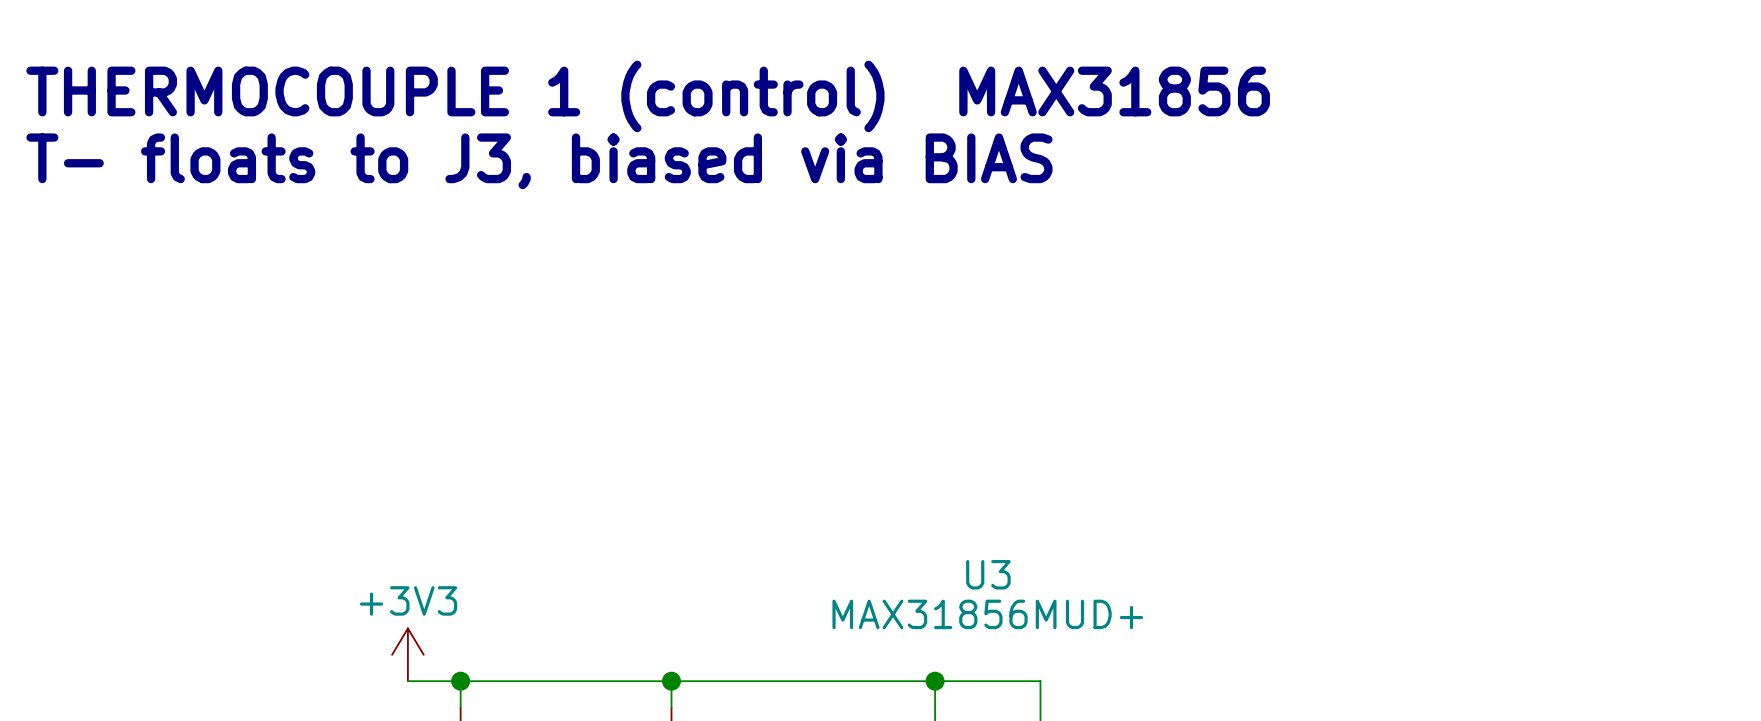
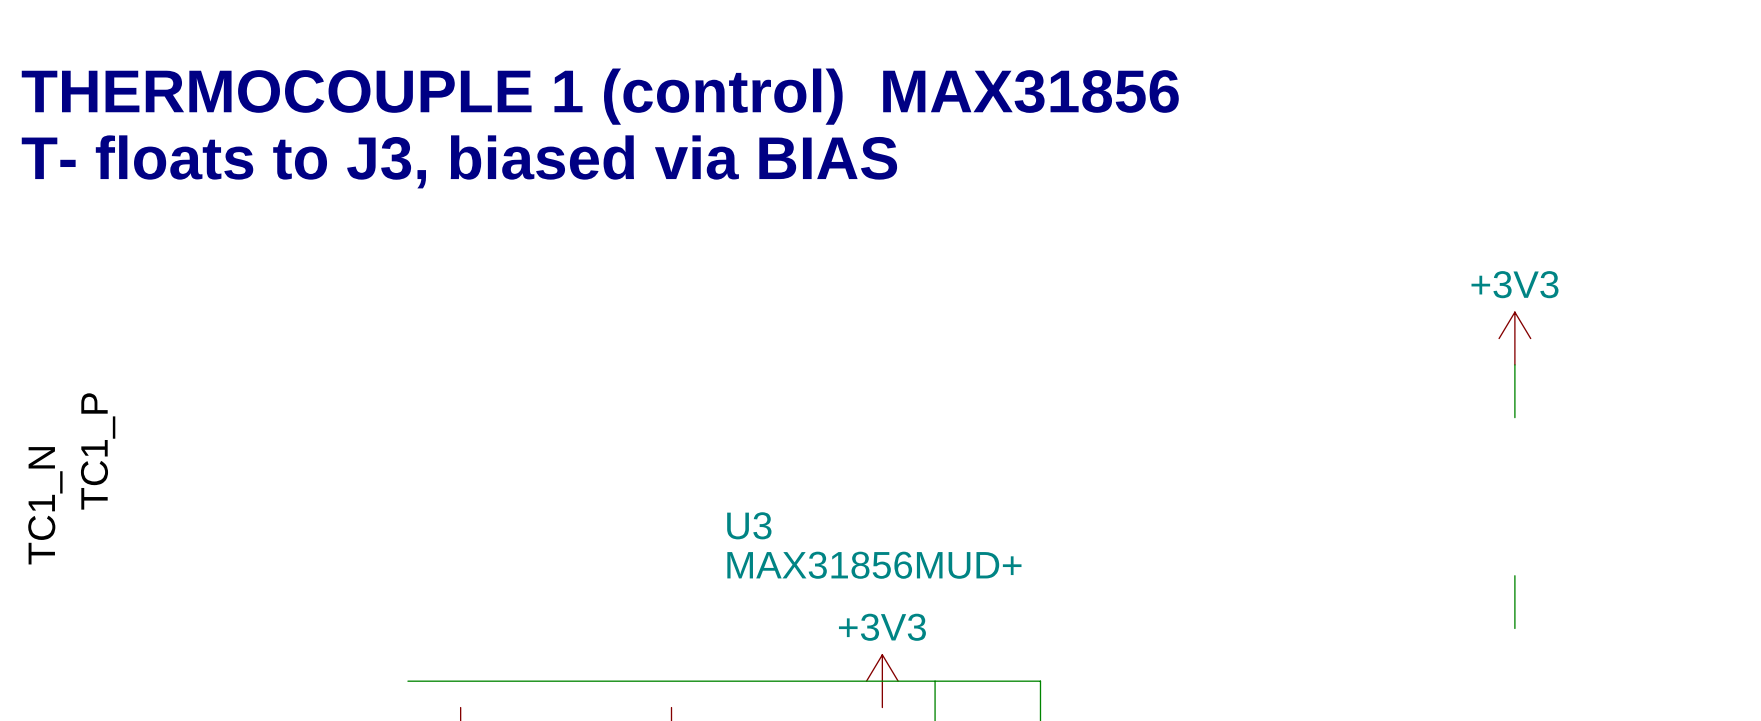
power symbol: none -> +3V3 (1514, 338)
wire: none -> (1514, 364) (1514, 417)
label: none -> TC1_P (98, 451)
label: none -> TC1_N (45, 505)
U3 name position: U3 (988, 574) -> U3 (749, 525)
wire: none -> (1514, 575) (1514, 628)
U3 value position: MAX31856MUD+ (987, 614) -> MAX31856MUD+ (874, 565)
power symbol position: +3V3 (407, 654) -> +3V3 (882, 681)
wire: (460, 681) (460, 707) -> none
junction: (460, 681) -> none
wire: (671, 681) (671, 707) -> none
junction: (671, 681) -> none
junction: (935, 681) -> none

